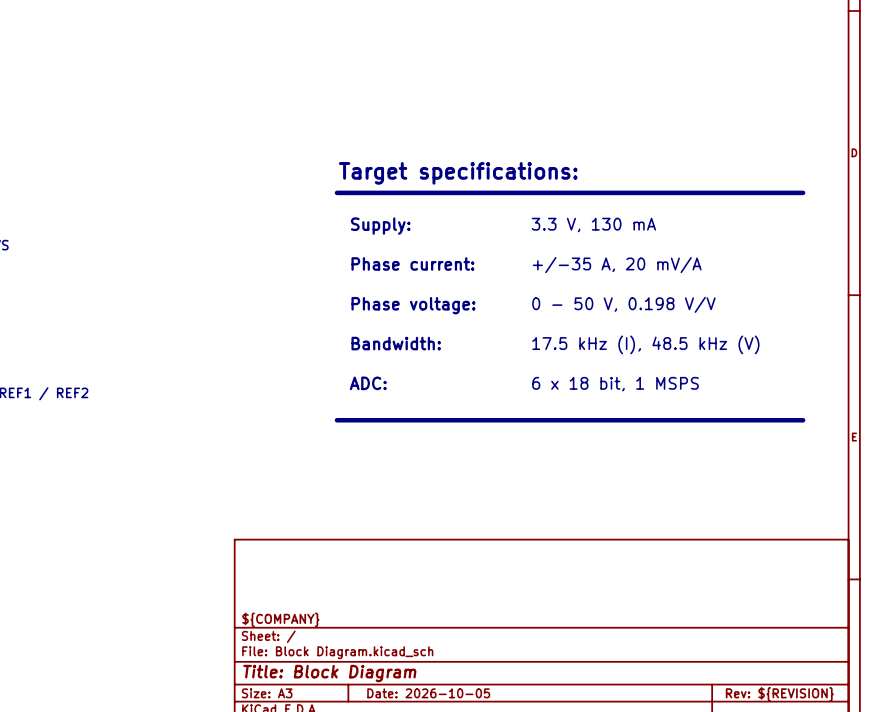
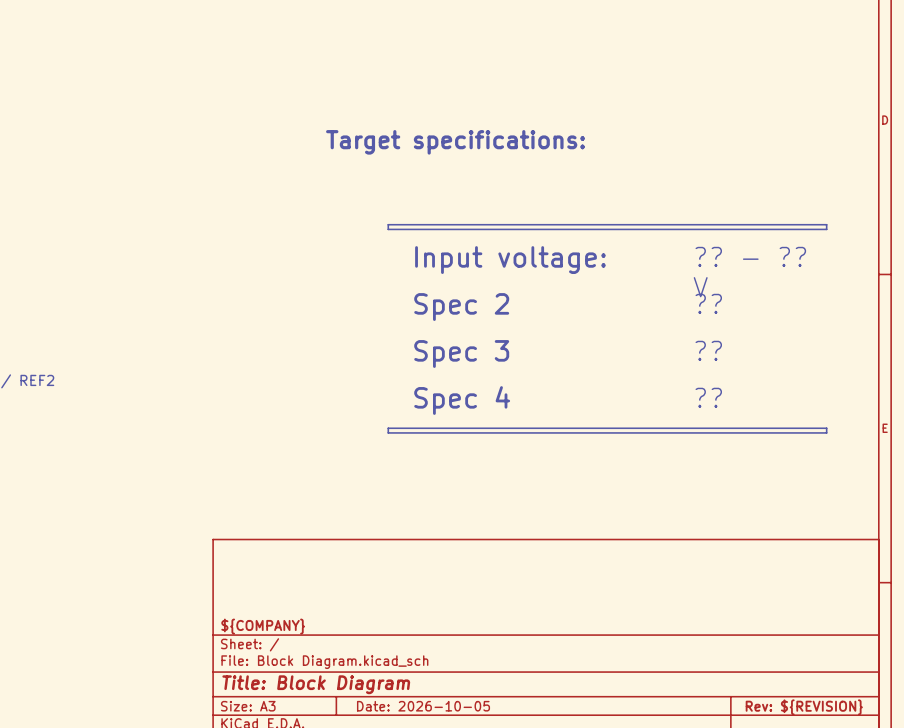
line: (337, 192) (803, 192) -> none
text: 3.3 V, 130 mA (593, 225) -> none
text: Supply: (380, 226) -> none
line: none -> (388, 224) (388, 229) (826, 229) (826, 224) (388, 224)
text: Phase current: (412, 263) -> none
text: +/-35 A, 20 mV/A (617, 265) -> none
text: none -> ?? - ?? (750, 256)
text: 0 - 50 V, 0.198 V/V (623, 304) -> none
text: Phase voltage: (413, 305) -> Input voltage: (510, 260)
text: none -> V (700, 287)
text: none -> ?? (708, 303)
text: none -> Spec 2 (461, 307)
text: Bandwidth: (396, 343) -> none
text: 17.5 kHz (I), 48.5 kHz (V) (645, 344) -> none
text: none -> ?? (708, 350)
text: none -> Spec 3 (461, 354)
text: ADC: (368, 383) -> none
text: 6 x 18 bit, 1 MSPS (615, 384) -> none
text: none -> ?? (708, 397)
text: none -> Spec 4 (462, 400)
line: (337, 420) (803, 420) -> none
line: none -> (388, 428) (826, 428) (826, 432) (388, 432) (388, 428)

